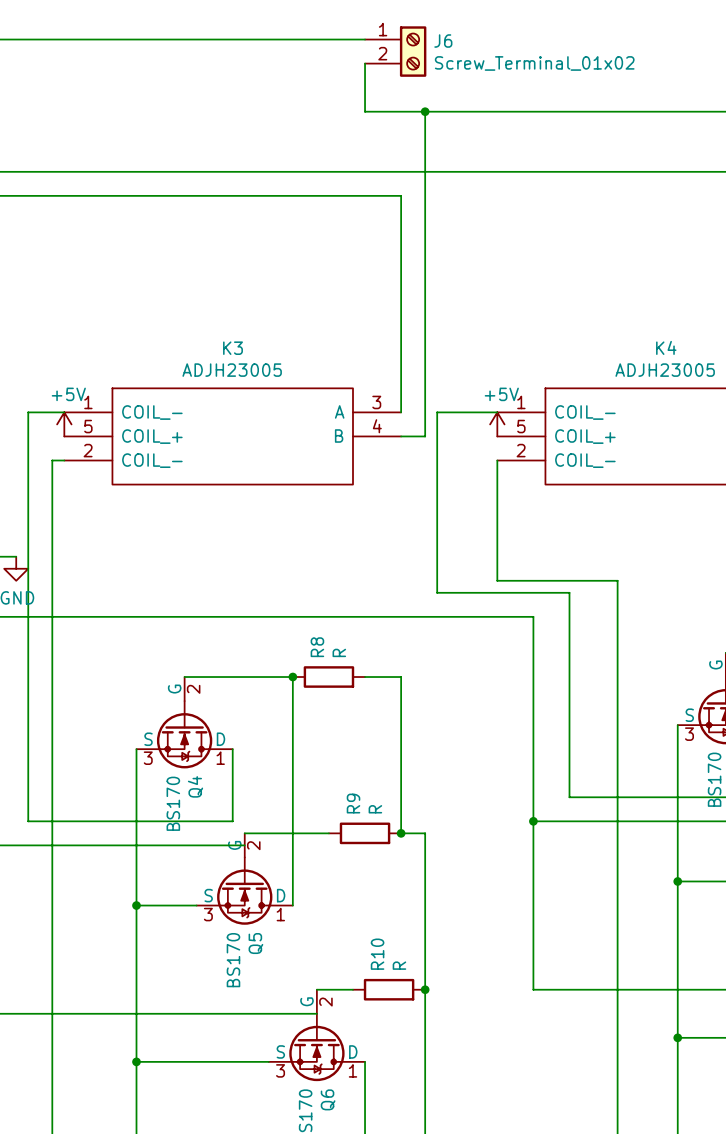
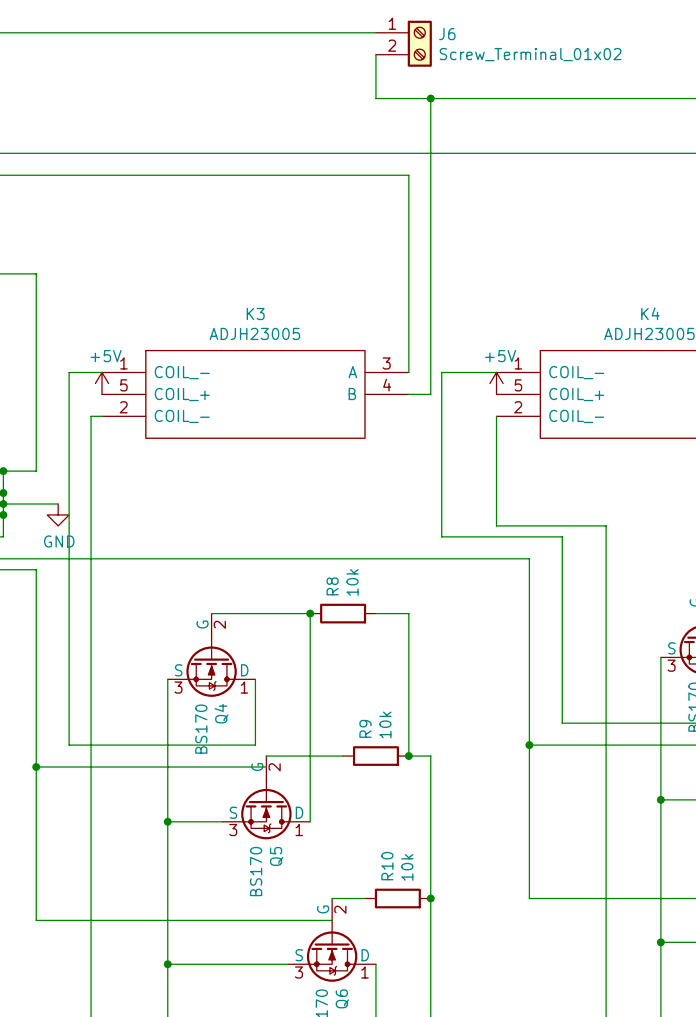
R8 value: R (339, 652) -> 10k (352, 582)
R9 value: R (375, 809) -> 10k (385, 724)
R10 value: R (399, 965) -> 10k (407, 867)

